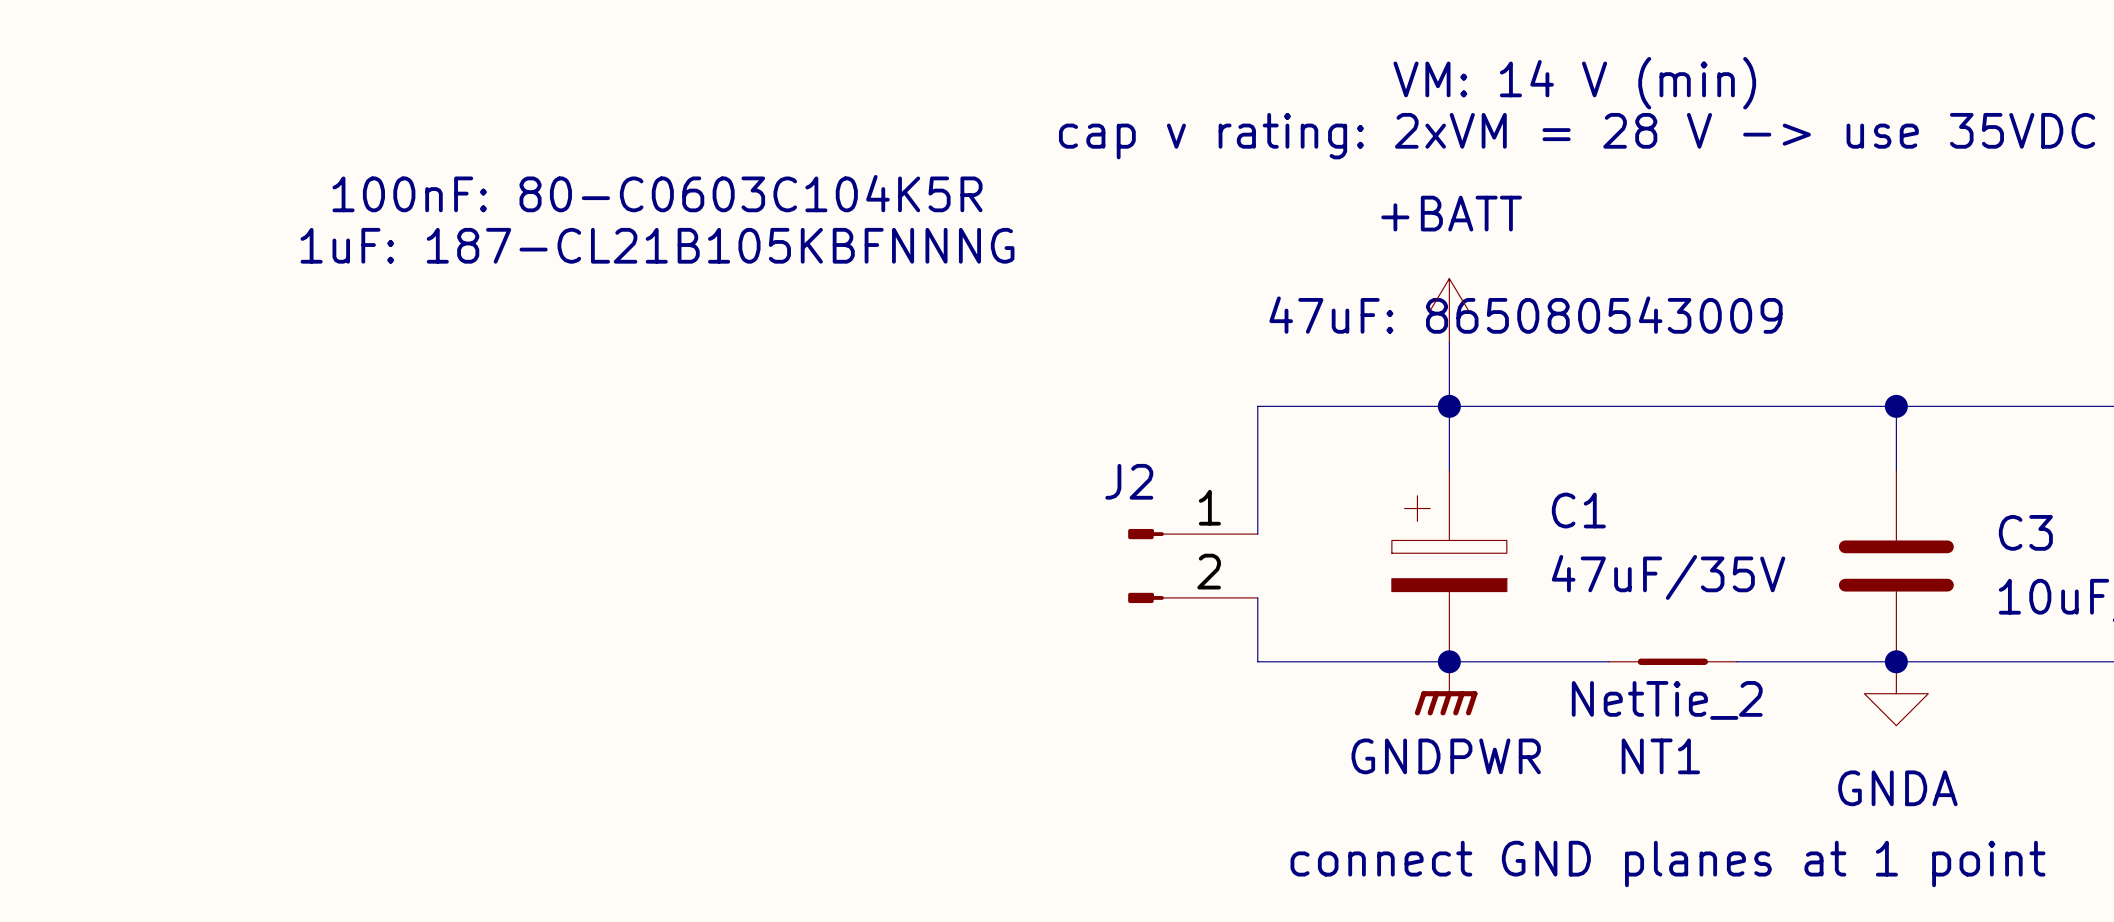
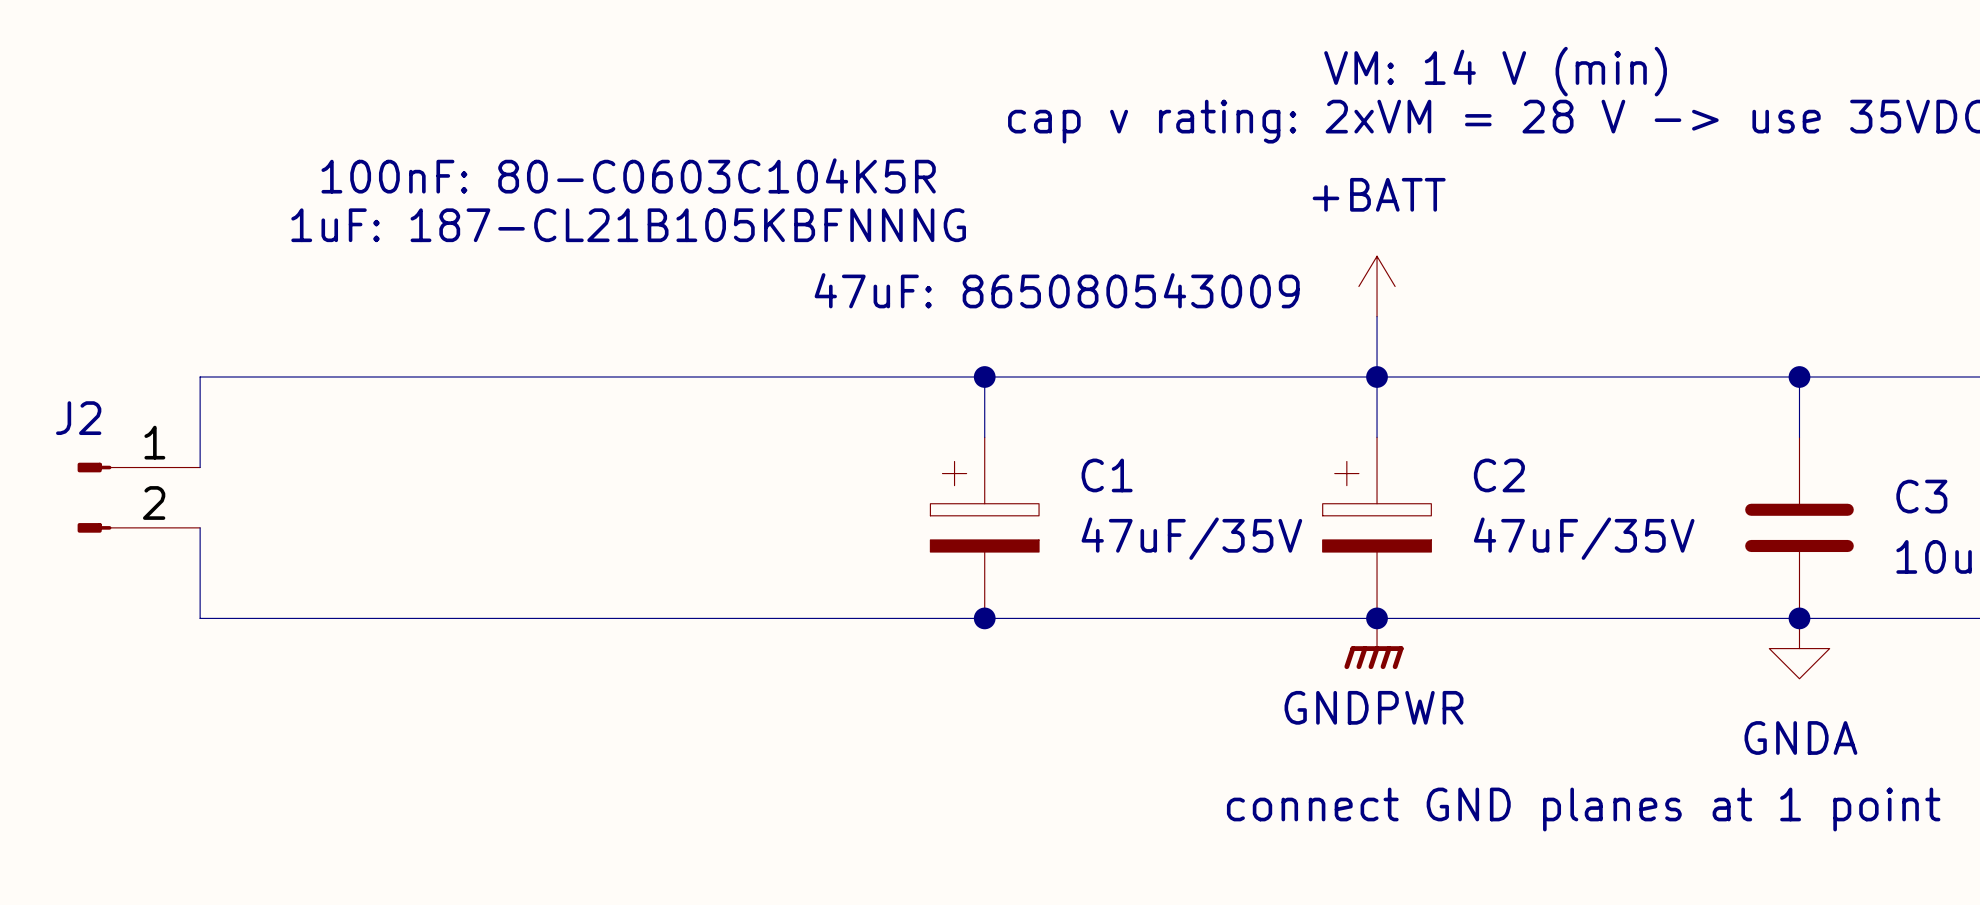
text position: 47uF: 865080543009 (1525, 315) -> 47uF: 865080543009 (1057, 290)
wire: none -> (984, 377) (984, 437)
junction: none -> (984, 377)
wire: (1257, 406) (1257, 534) -> (1195, 377) (200, 377) (200, 467)
C1 name: C1 (1578, 510) -> C2 (1499, 475)
C1: none -> 47uF/35V (984, 527)
J2 position: (1192, 566) -> (138, 497)
wire: (1257, 597) (1257, 661) -> (200, 527) (200, 618) (1195, 618)
junction: none -> (984, 618)
NT1: NetTie_2 (1672, 661) -> none

